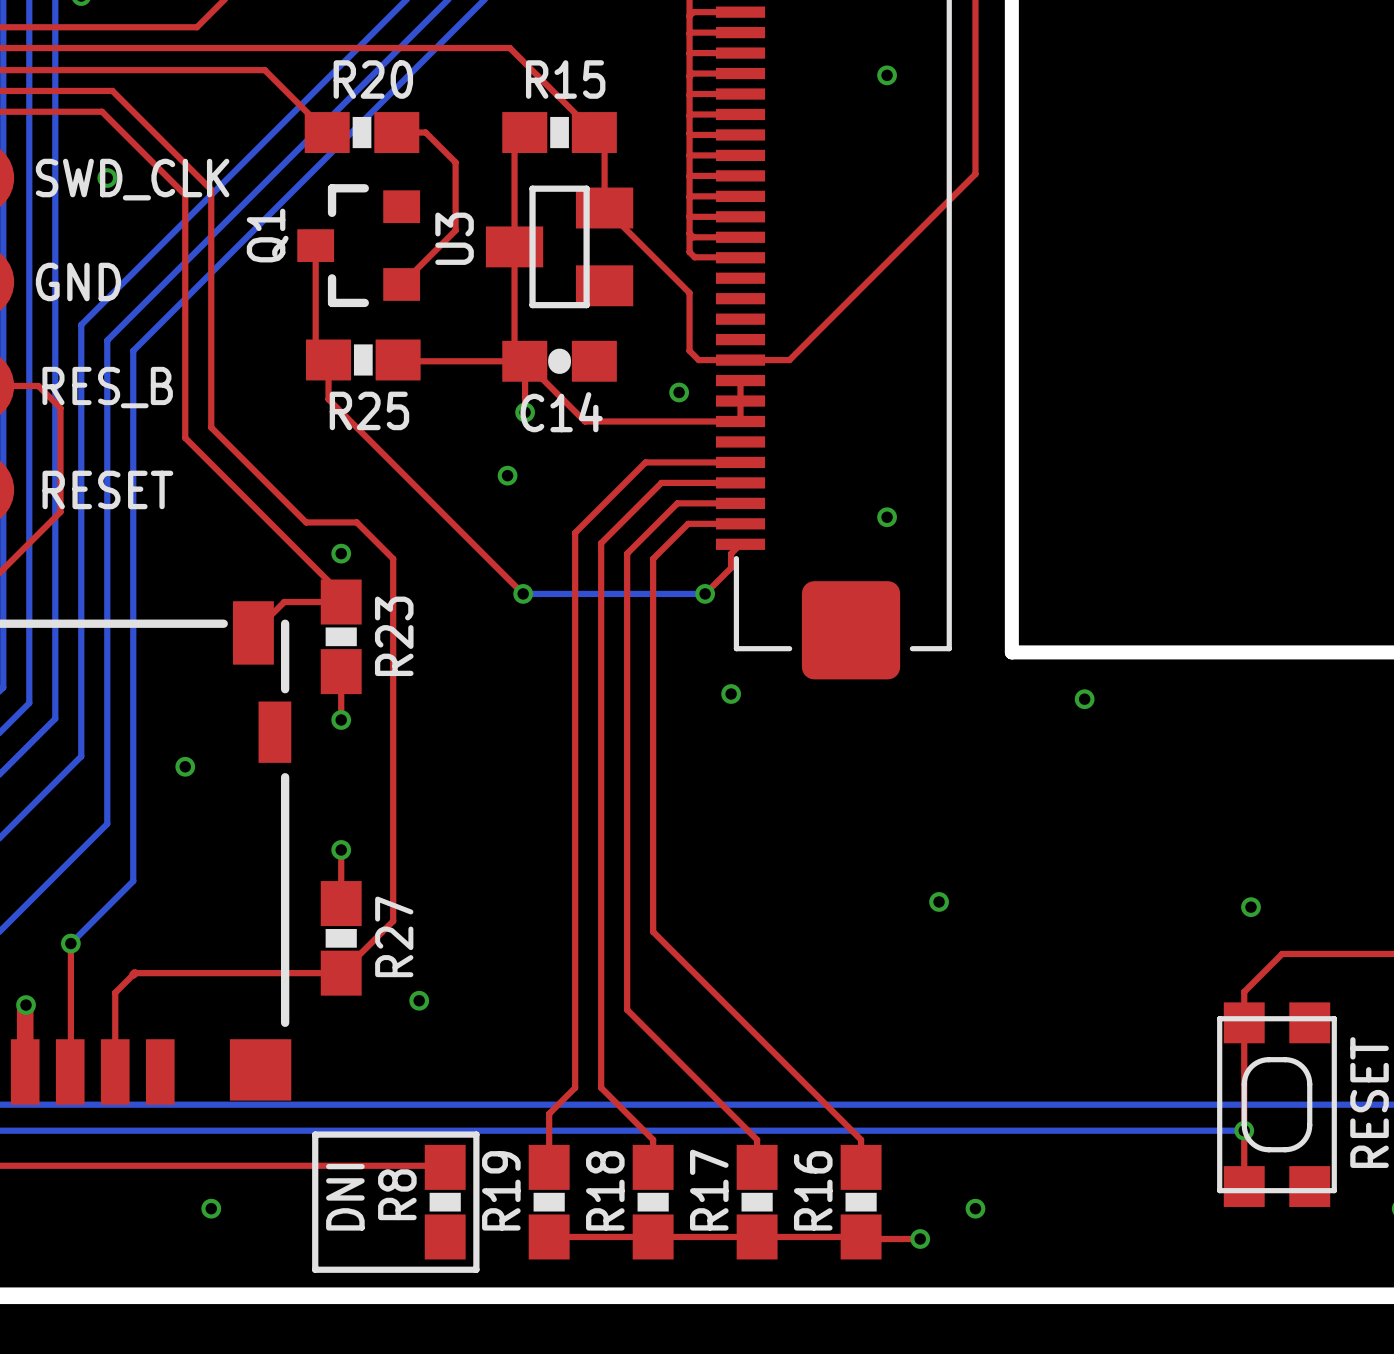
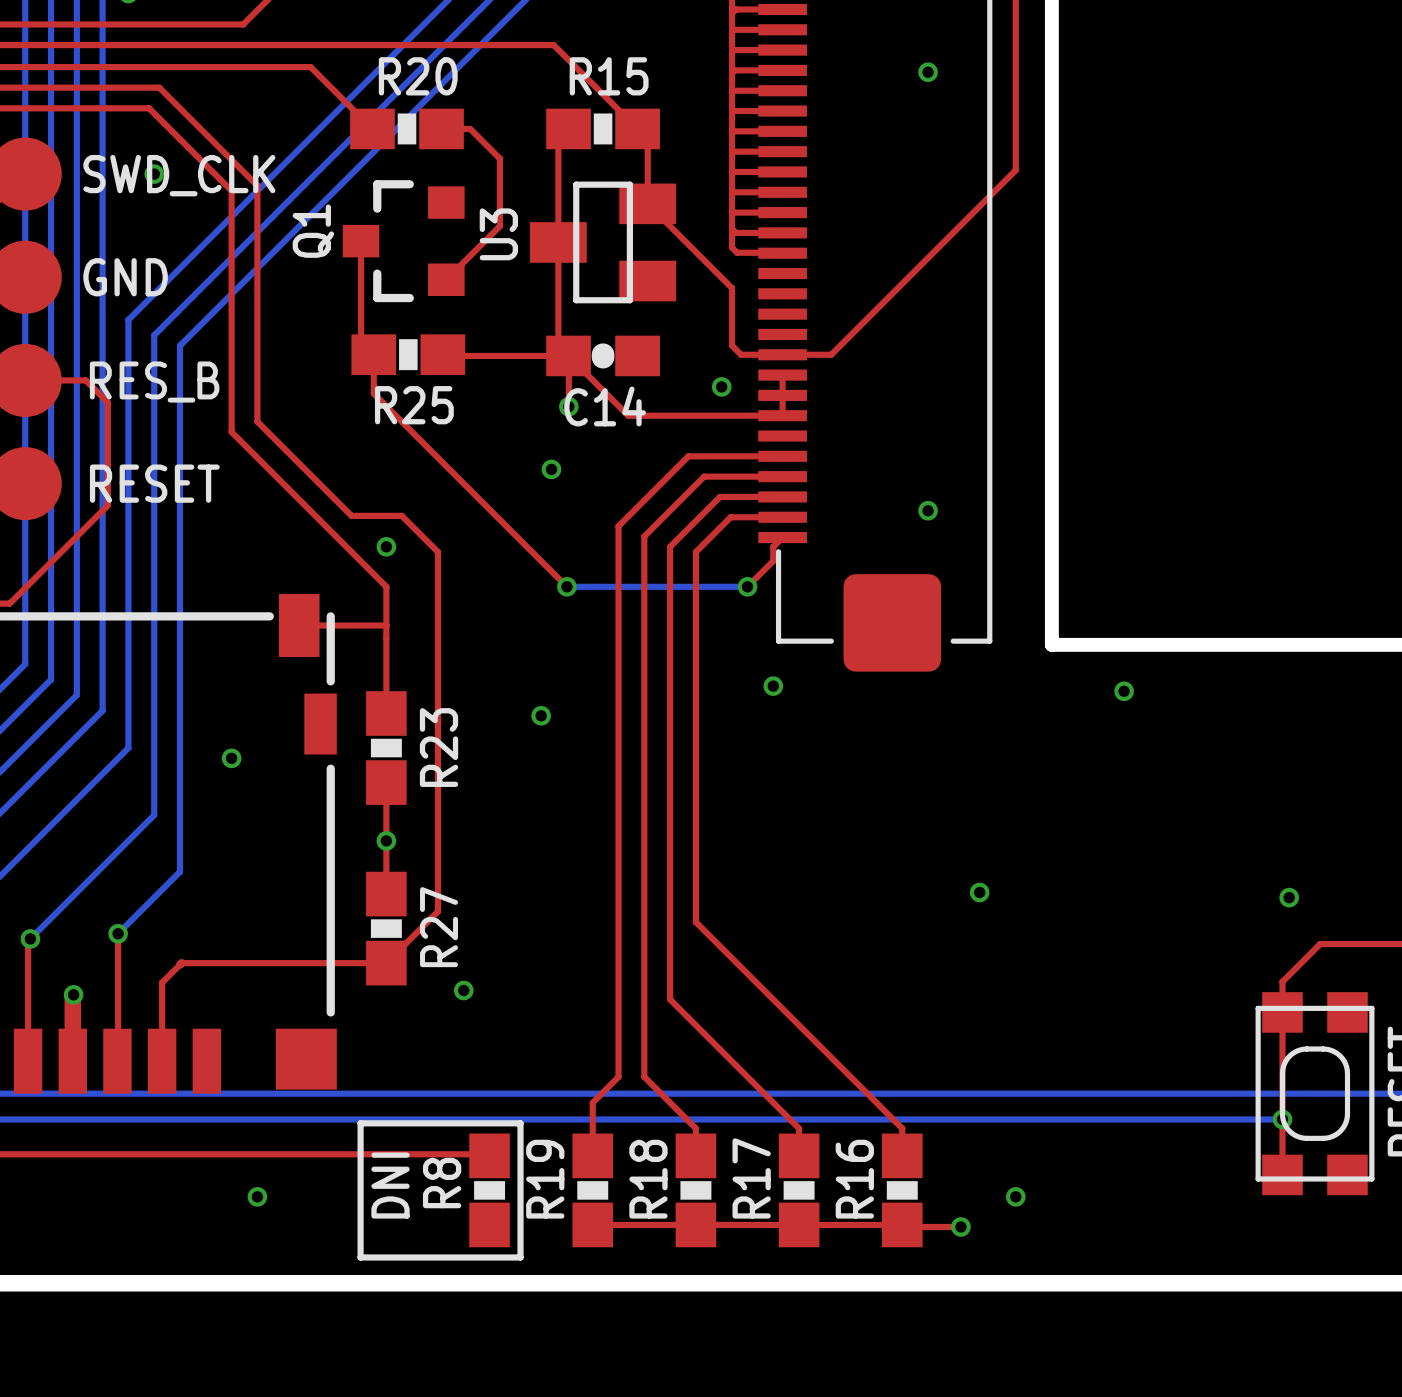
top track: (341, 602) (284, 602) (253, 632) -> (386, 625) (299, 625)
top track: none -> (386, 594) (386, 663)
R23 position: (341, 636) -> (386, 748)
via position: (341, 719) -> (541, 715)
top track: none -> (386, 782) (386, 840)

